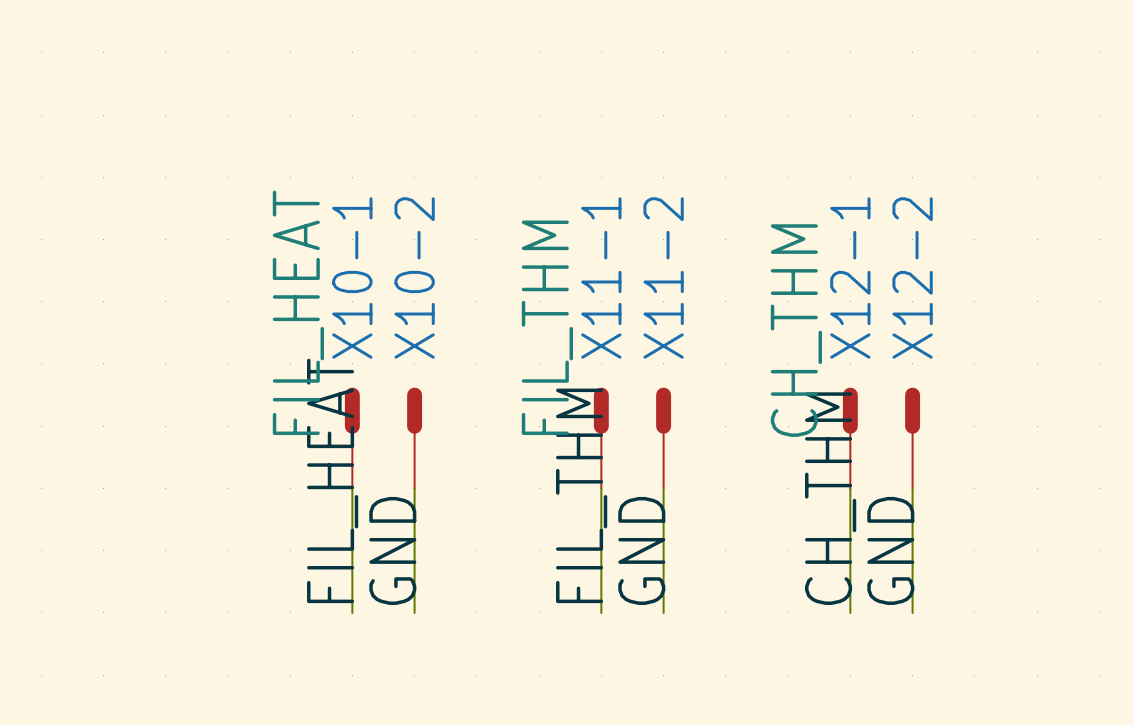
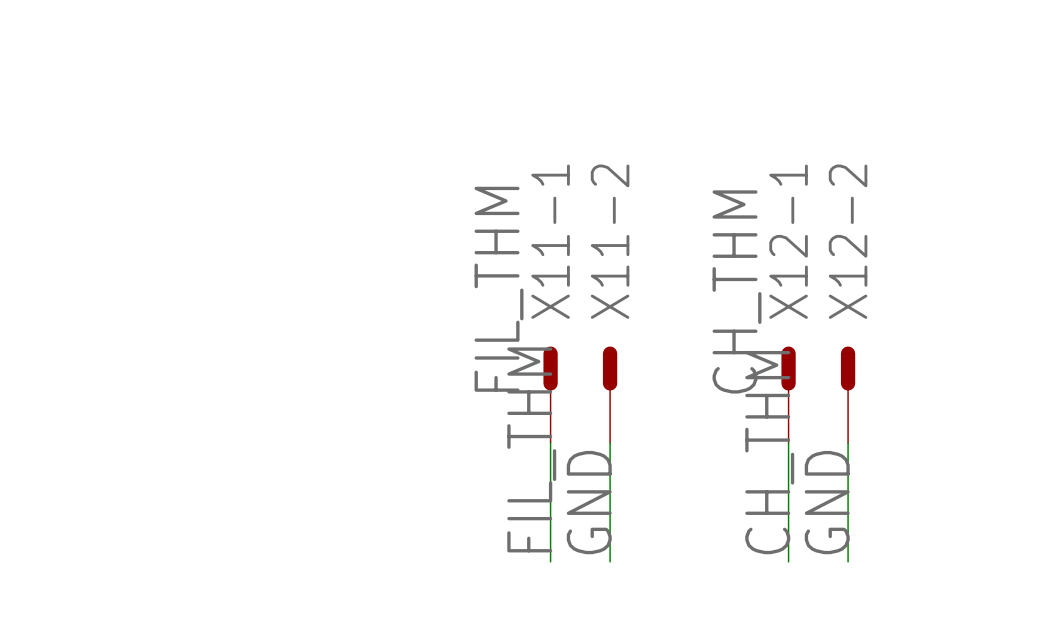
X10-1: FIL_HEAT (352, 438) -> none
X10-2: (414, 438) -> none
label: FIL_HEAT (332, 480) -> none
wire: (352, 488) (352, 612) -> none
wire: (414, 488) (414, 612) -> none
label: GND (392, 550) -> none

